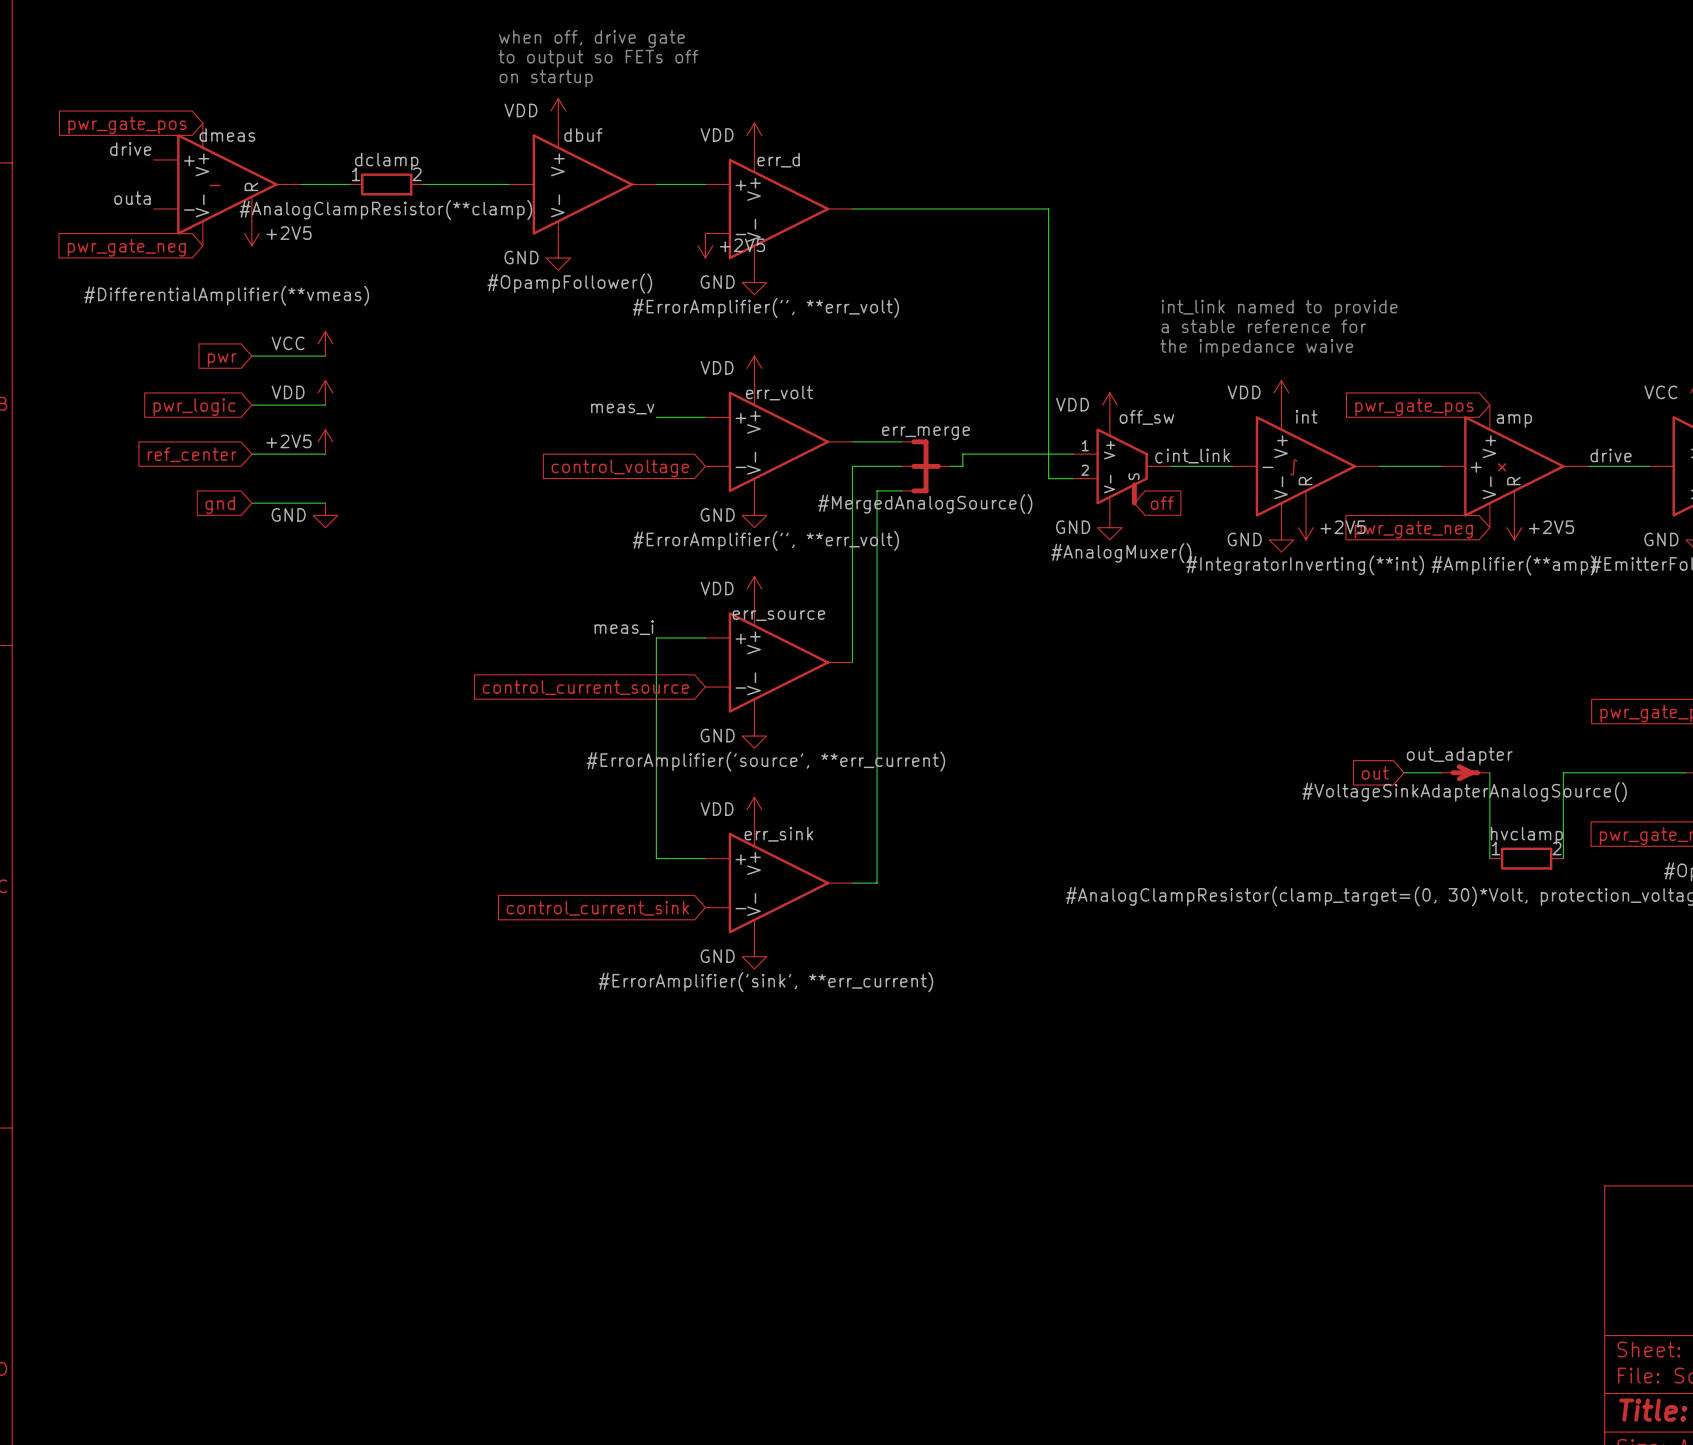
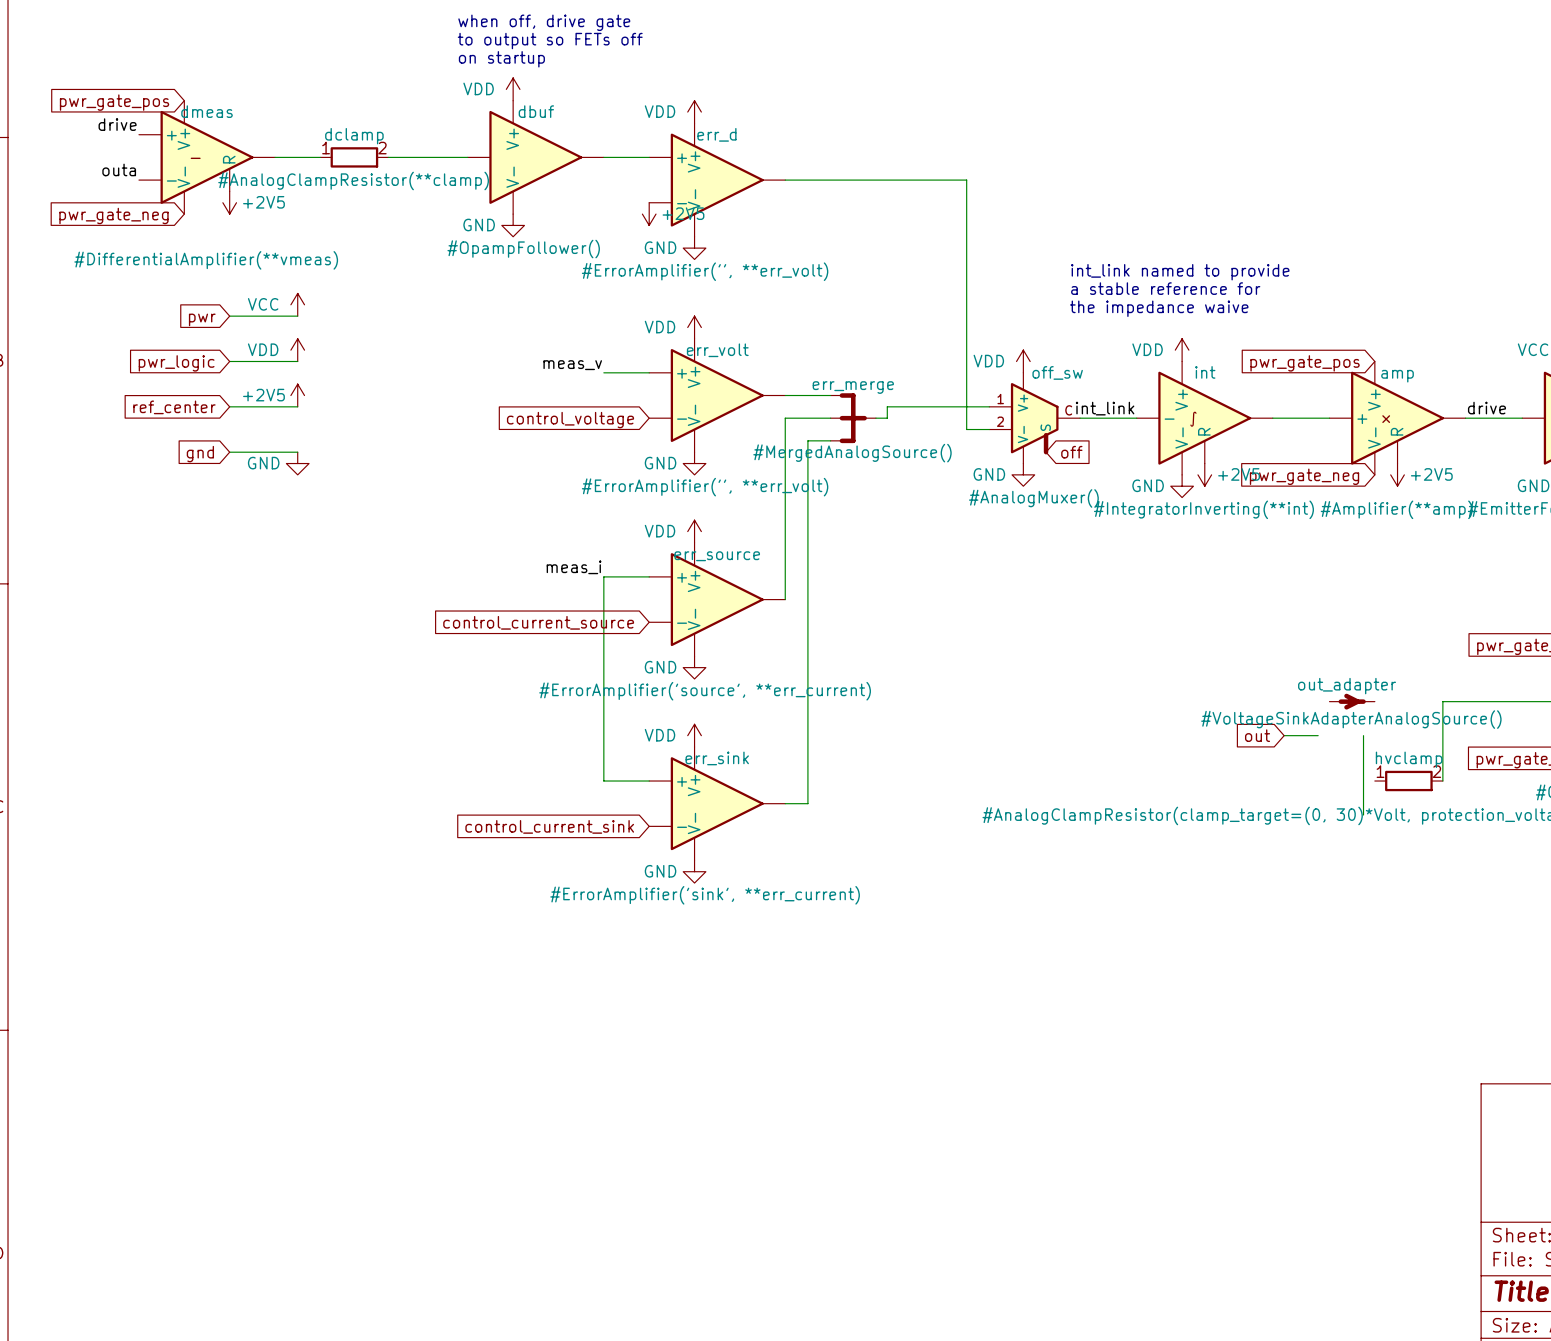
global label position: out (1375, 772) -> out (1257, 735)
wire: (1404, 772) (1440, 772) -> (1284, 735) (1318, 735)
wire: (1489, 772) (1489, 858) -> (1363, 735) (1363, 815)

